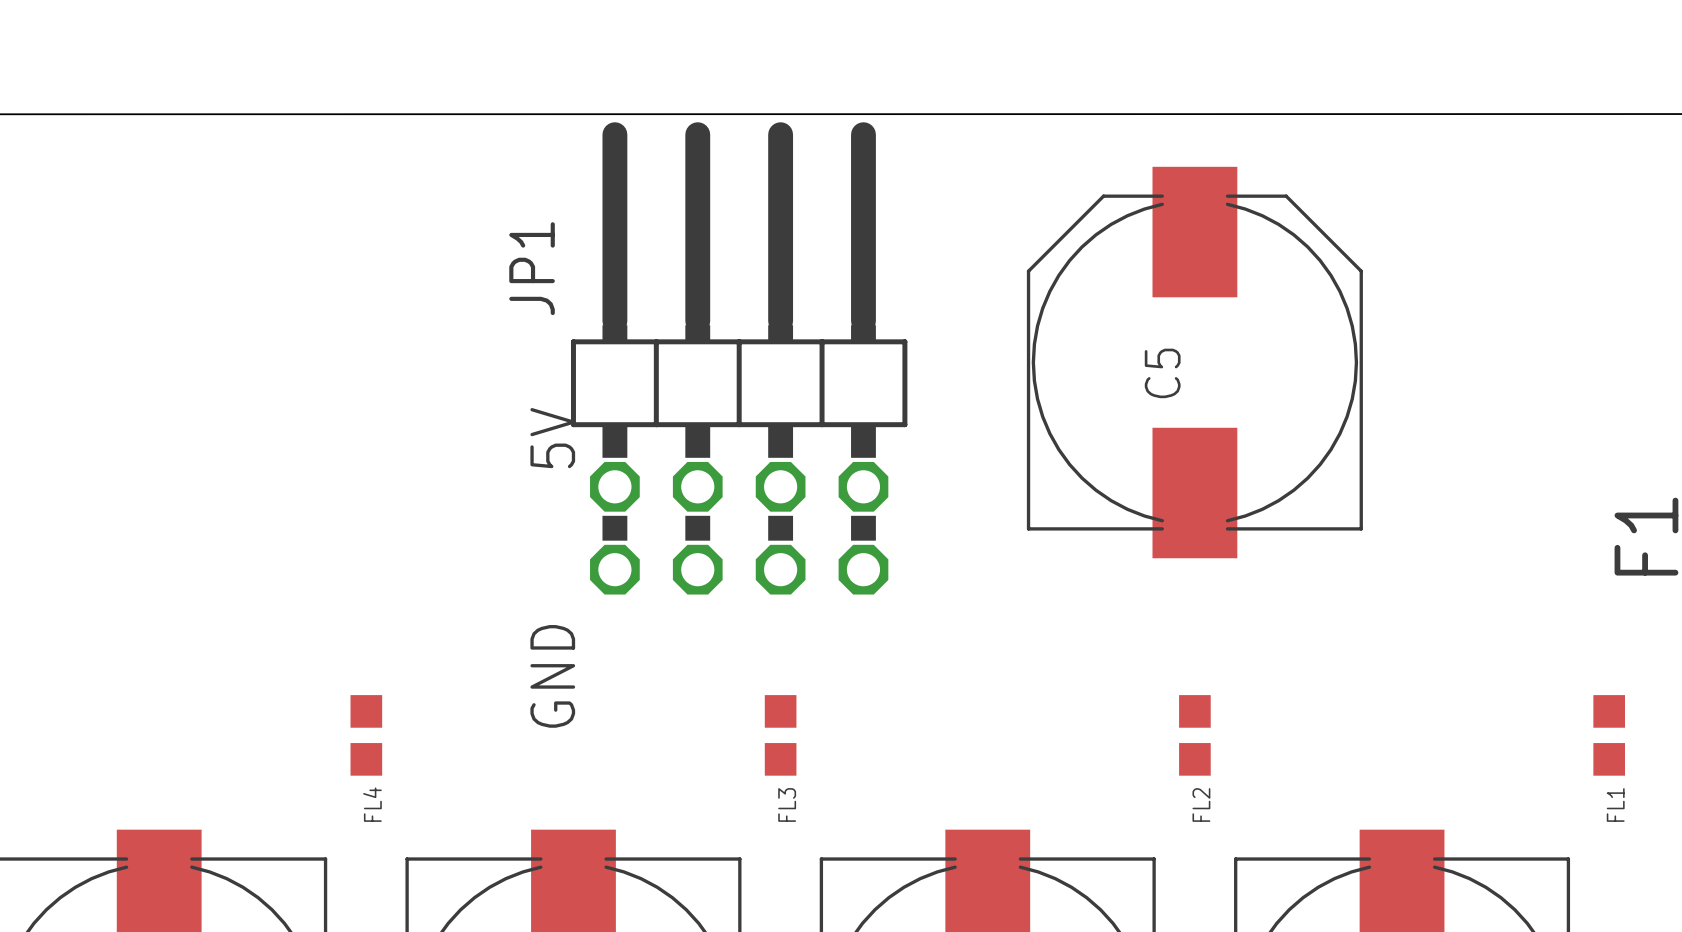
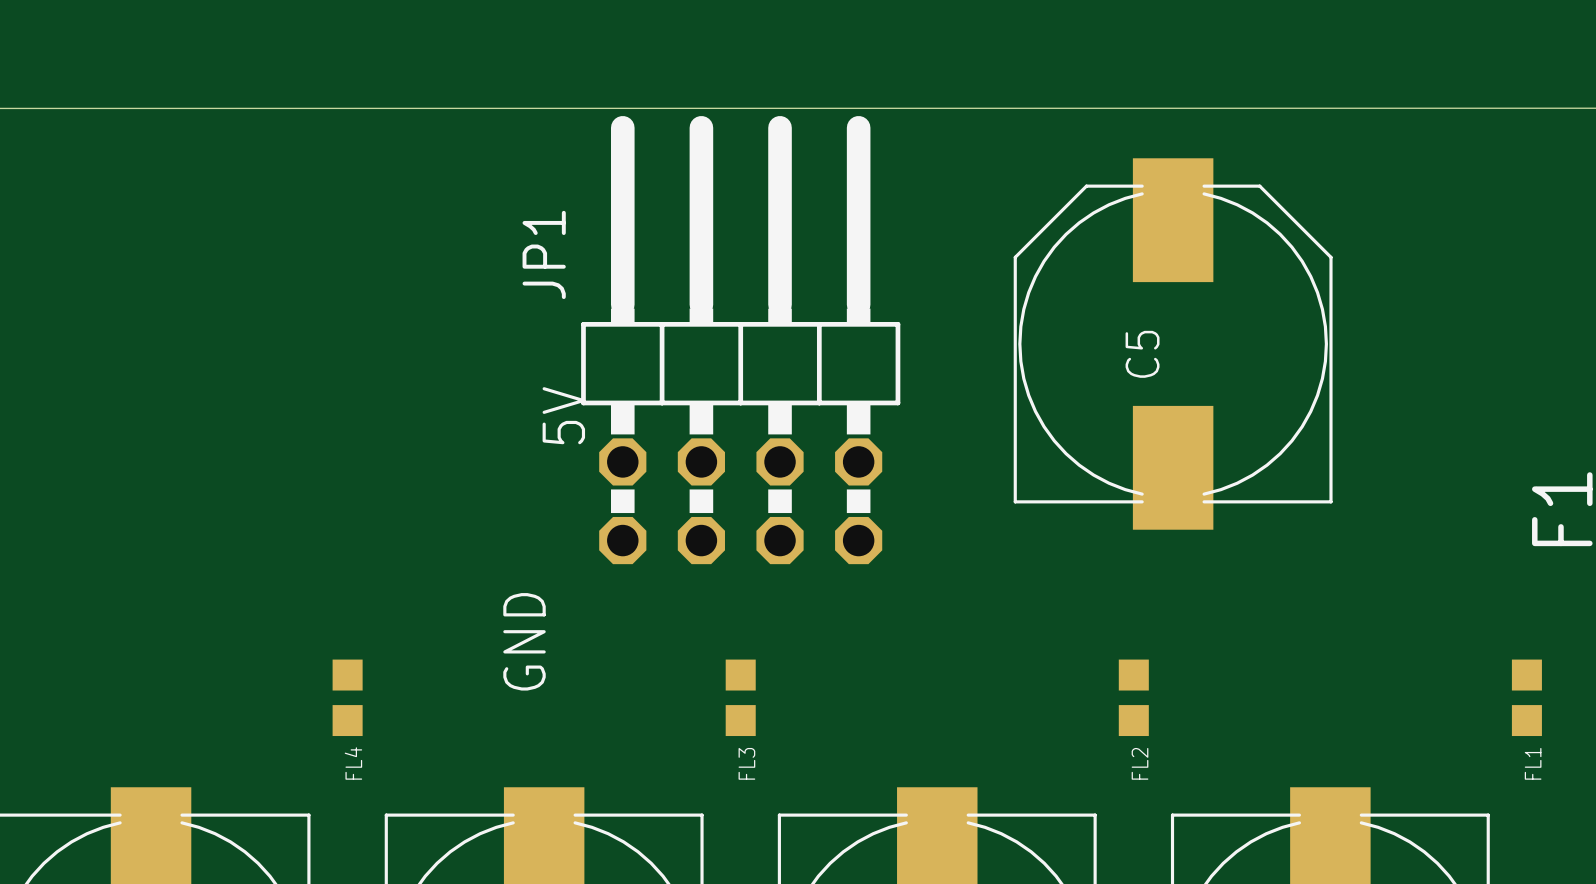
JP1 position: (739, 358) -> (740, 340)
C5 position: (1194, 362) -> (1173, 344)
text position: 5V (552, 438) -> 5V (563, 415)

